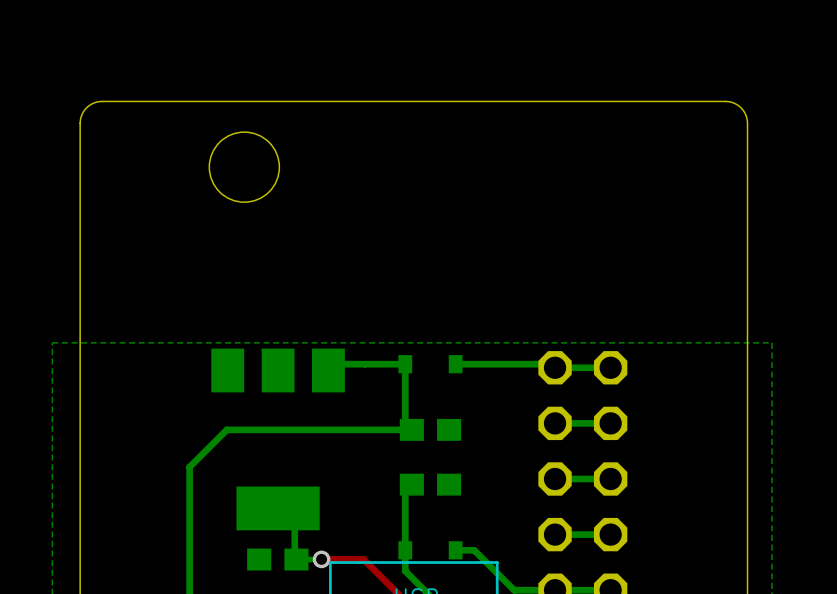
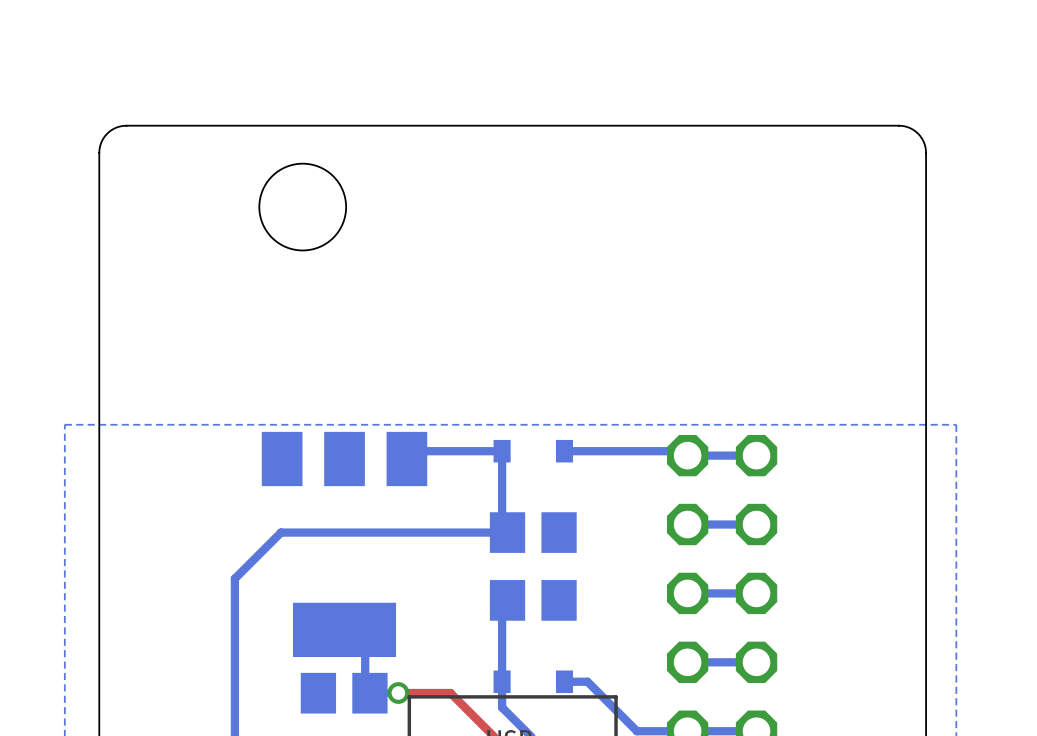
part footprint: [399, 418, 462, 441] -> [489, 512, 577, 553]
part footprint: [399, 473, 462, 496] -> [489, 580, 577, 621]
part footprint: [247, 548, 309, 571] -> [300, 672, 388, 714]

